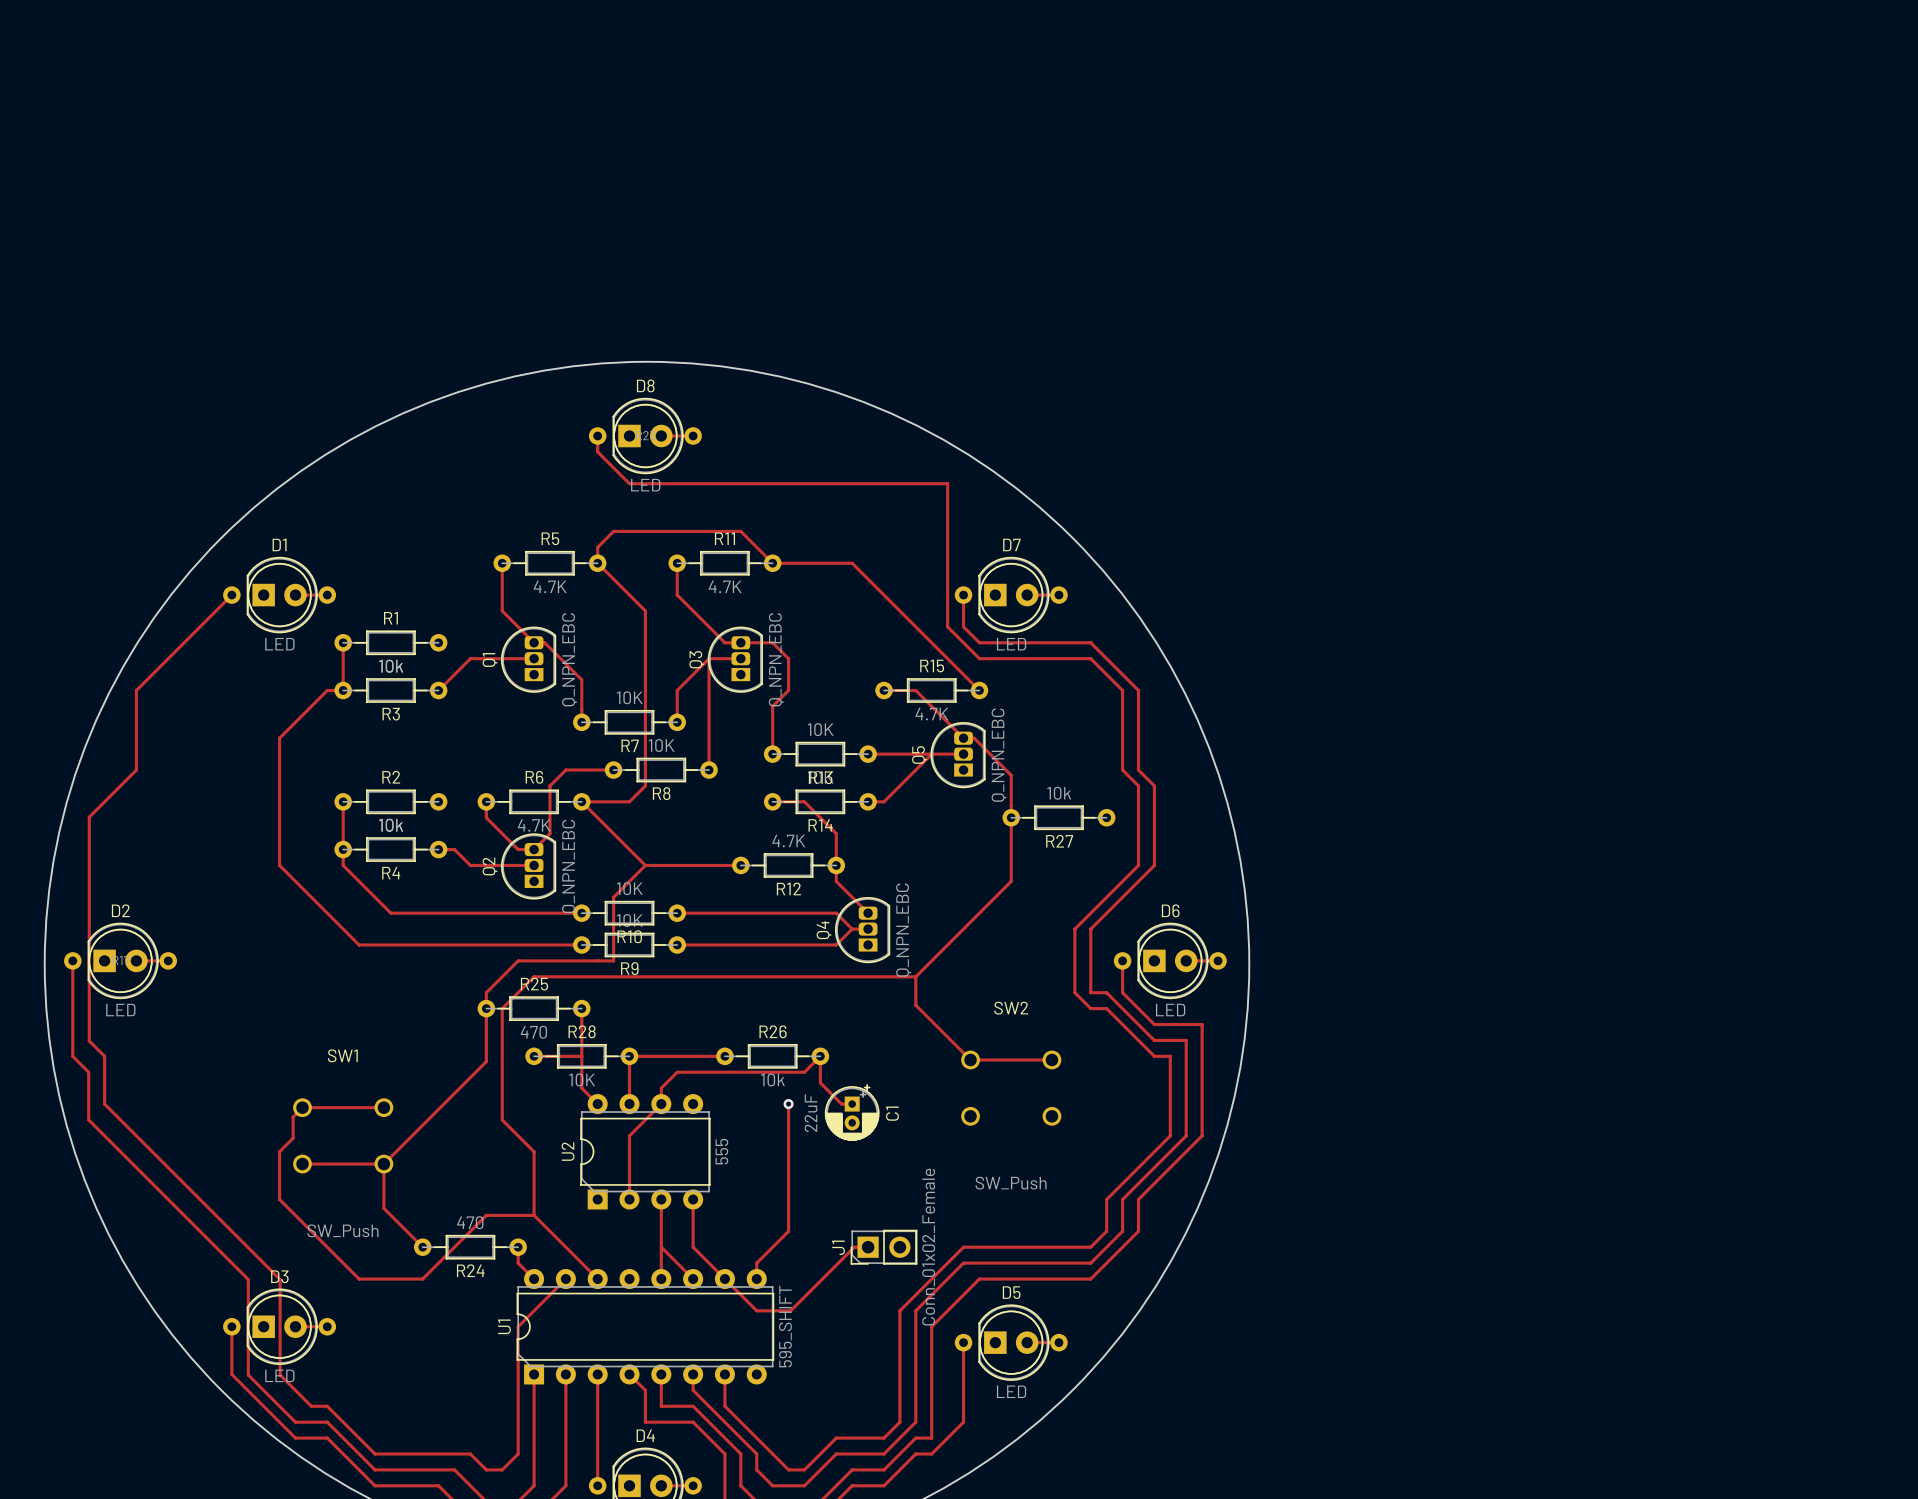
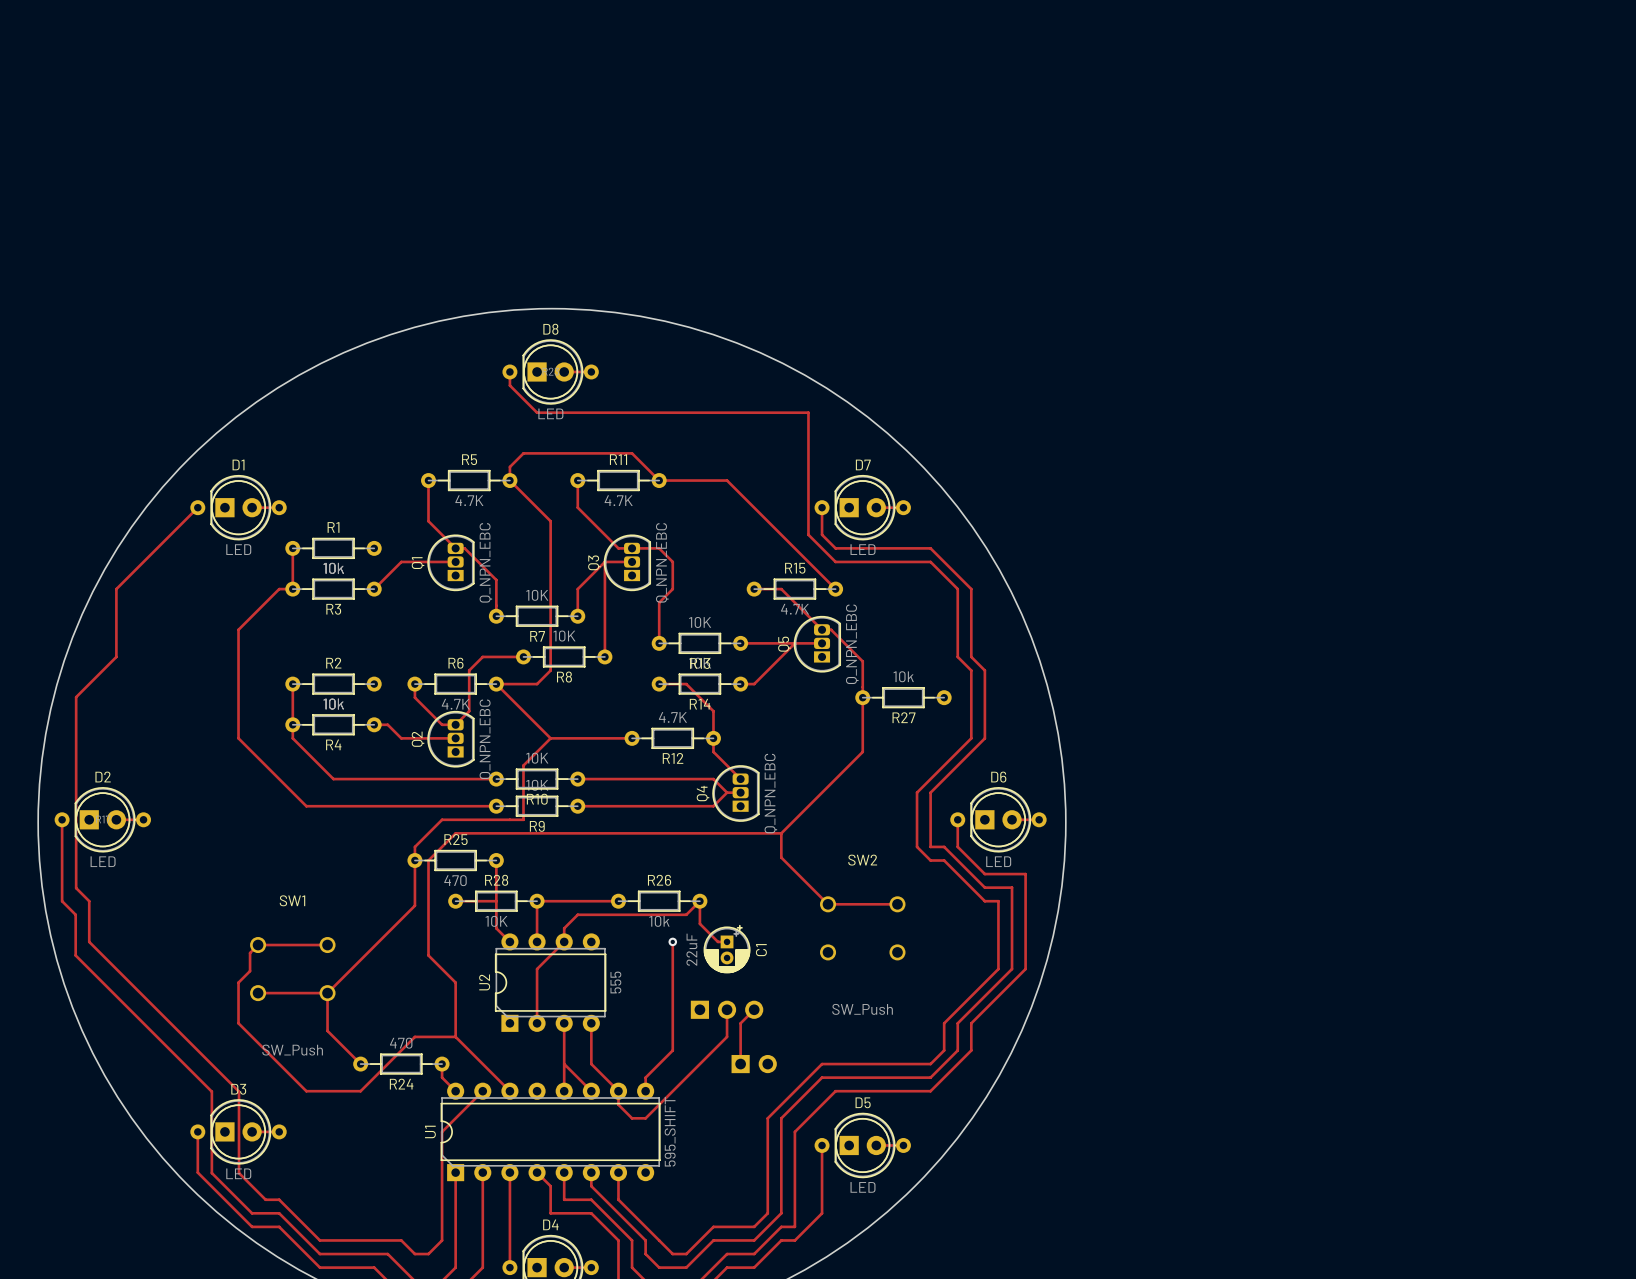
part: none -> (727, 1009)
track: none -> (754, 1009) (740, 1023) (740, 1064)
track: (868, 1247) (854, 1247) (790, 1310) (756, 1310) (724, 1279) -> (727, 1009) (727, 1036) (645, 1118) (632, 1118) (618, 1104) (618, 1091)
J1 side: top (884, 1247) -> bottom (754, 1064)

